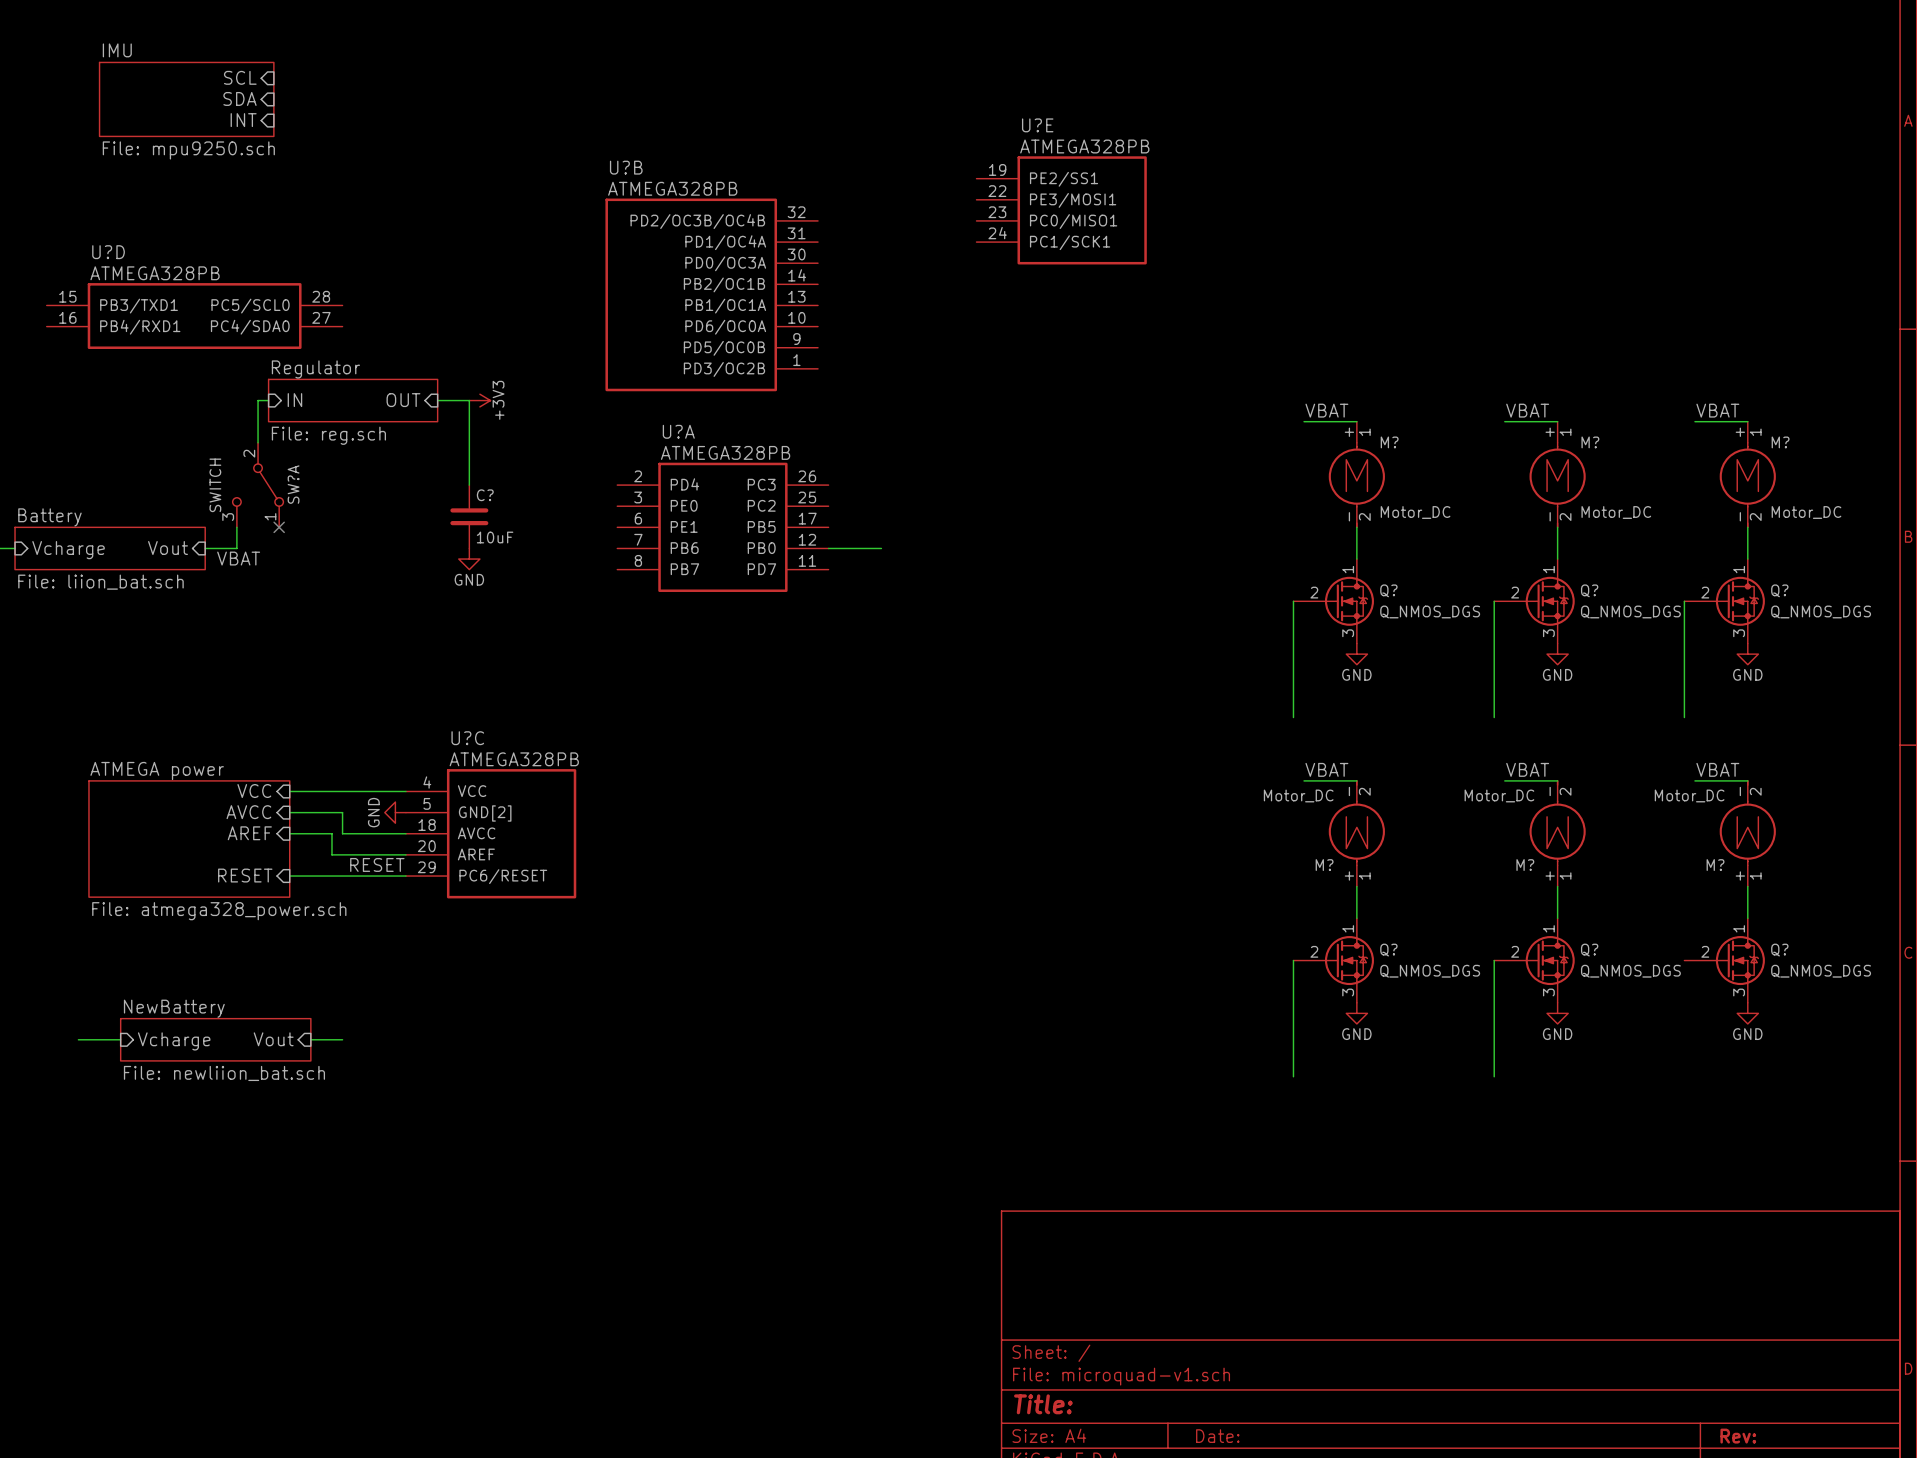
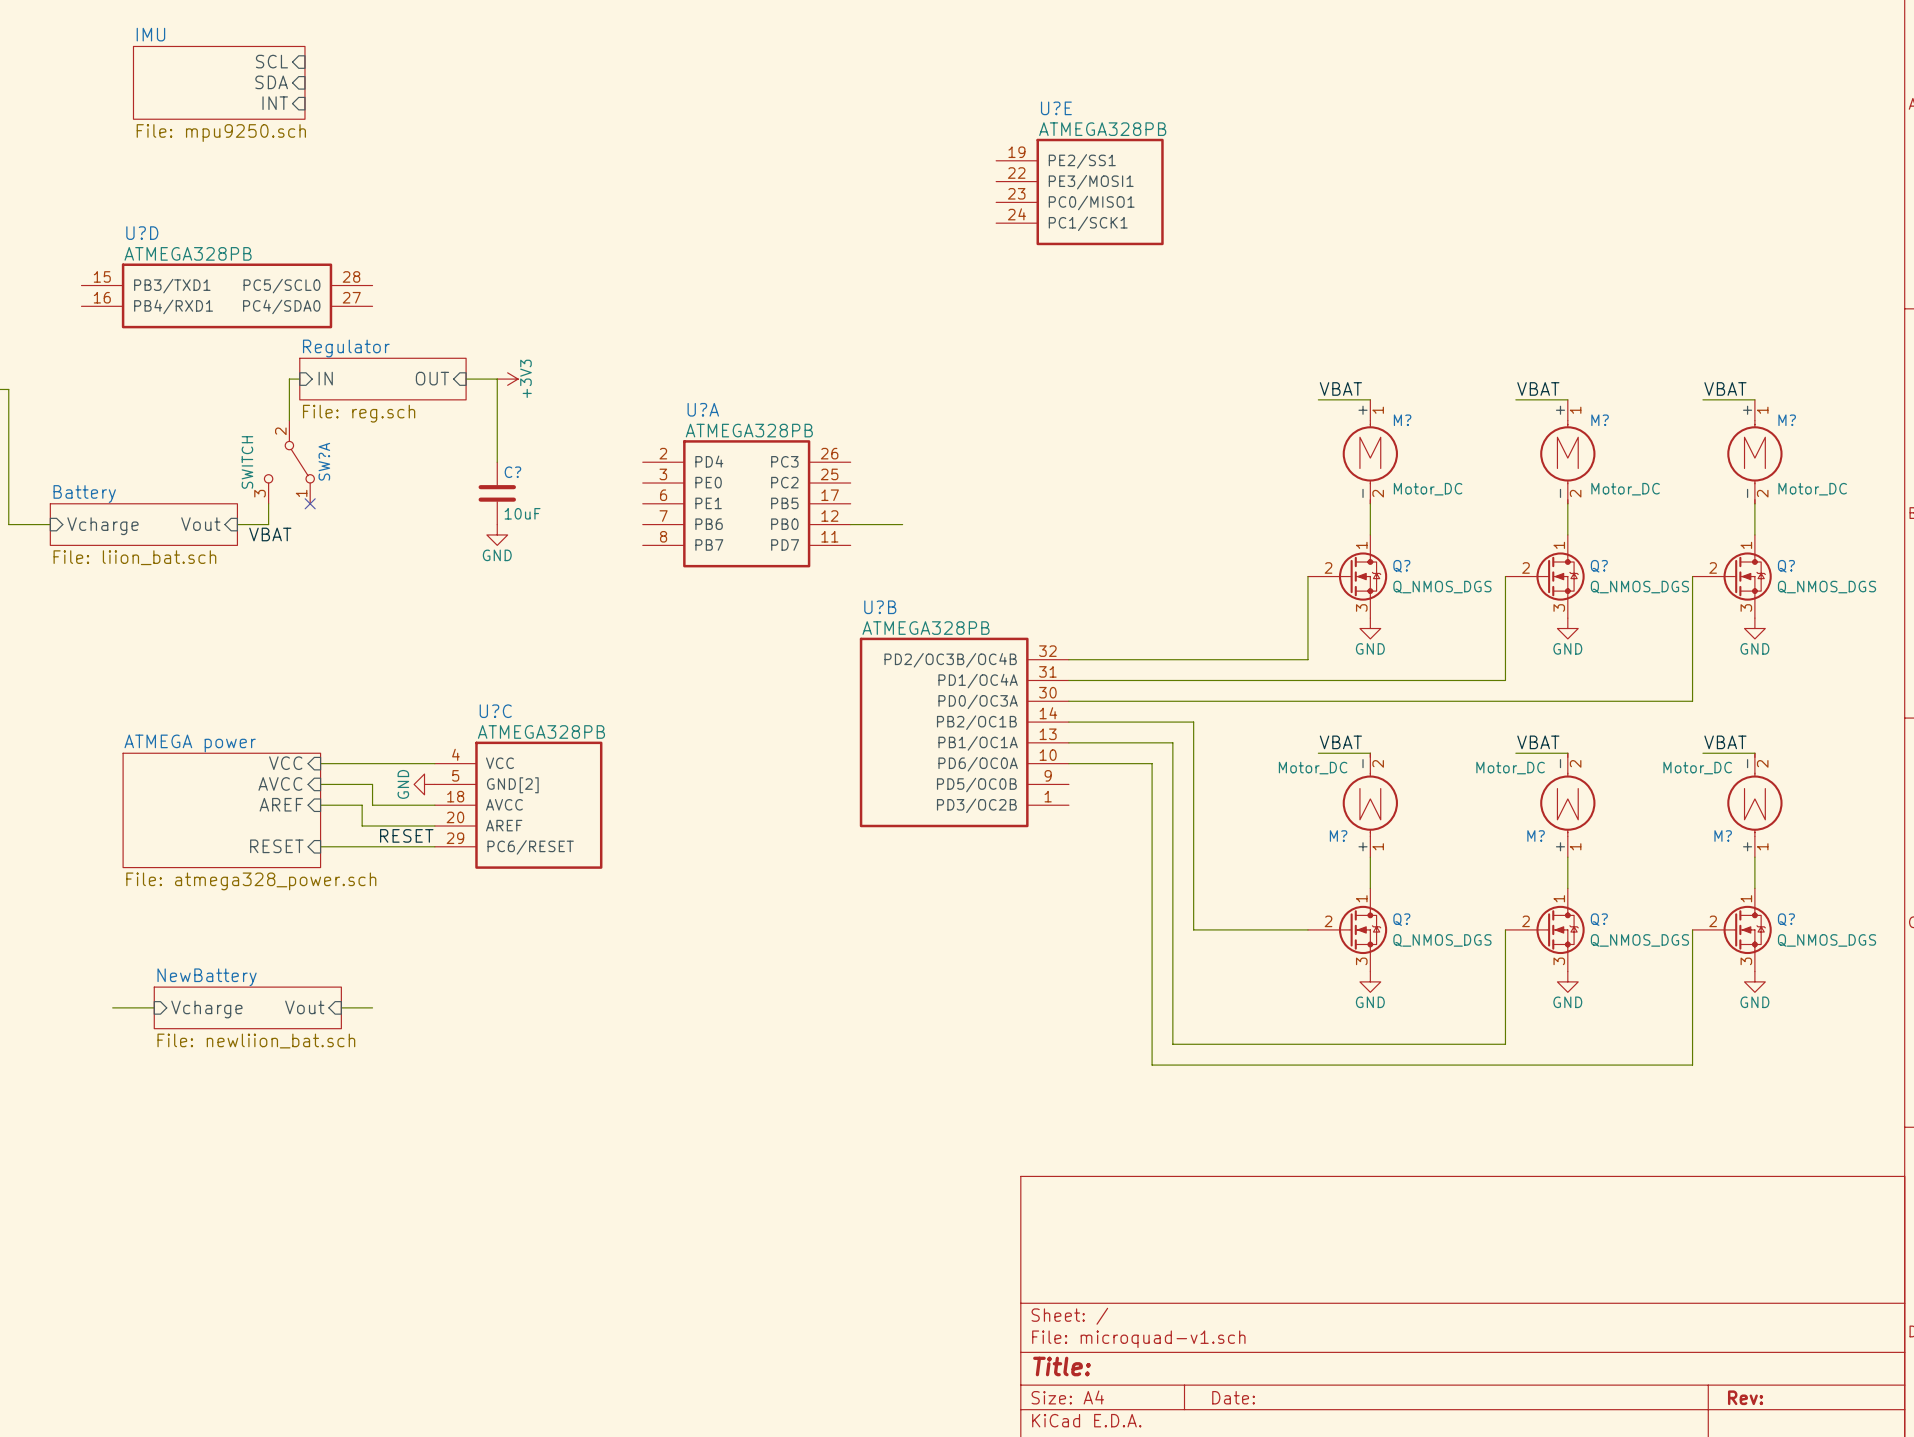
U?B: ATMEGA328PB (711, 294) -> none
wire: (1293, 685) (1293, 717) -> (1307, 659) (1068, 659)
wire: (1494, 706) (1494, 717) -> (1505, 680) (1068, 680)
wire: none -> (1692, 690) (1692, 701) (1068, 701)
U?B: none -> ATMEGA328PB (964, 732)
wire: none -> (1068, 742) (1172, 742) (1172, 1044) (1505, 1044)
wire: none -> (1068, 763) (1152, 763) (1152, 1065) (1692, 1065) (1692, 929)
wire: (1293, 960) (1293, 1076) -> (1307, 929) (1193, 929) (1193, 722) (1068, 722)

